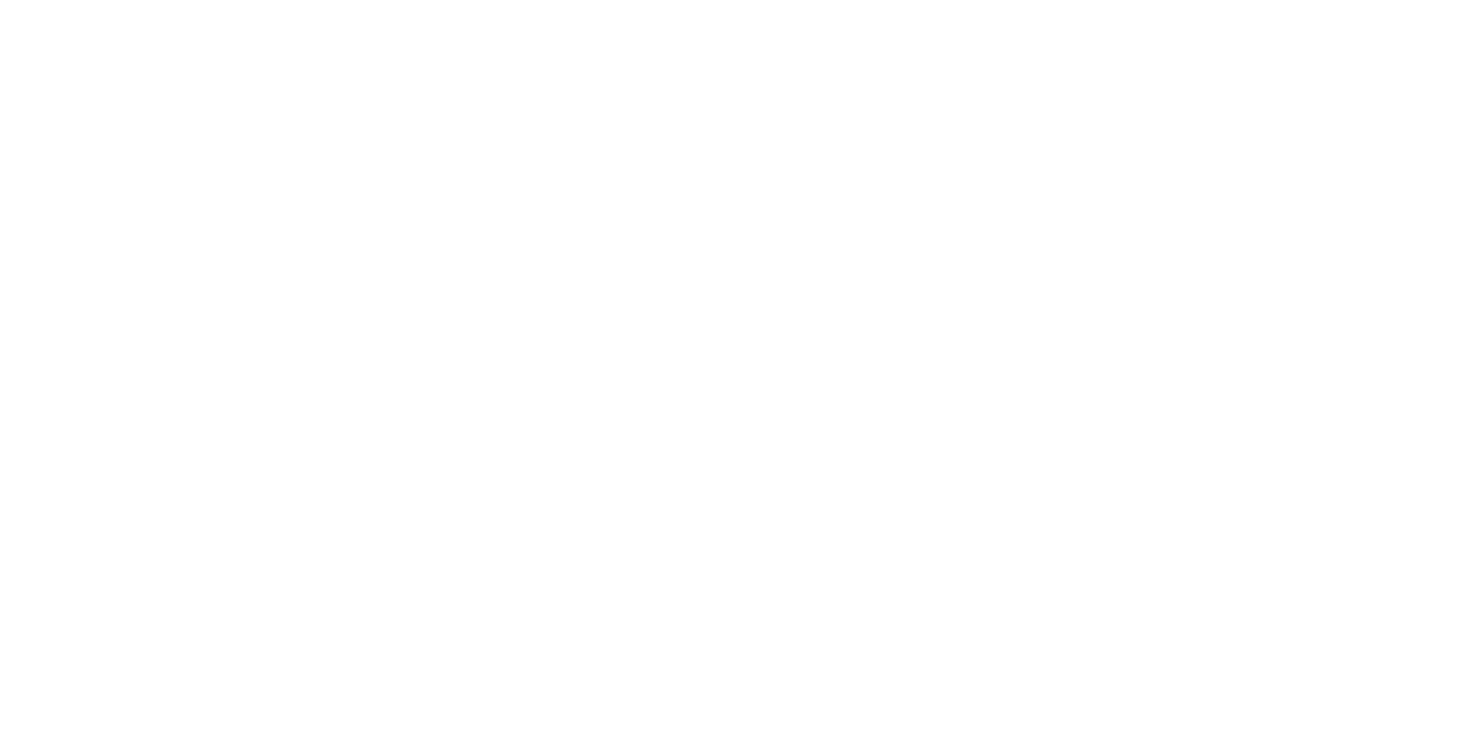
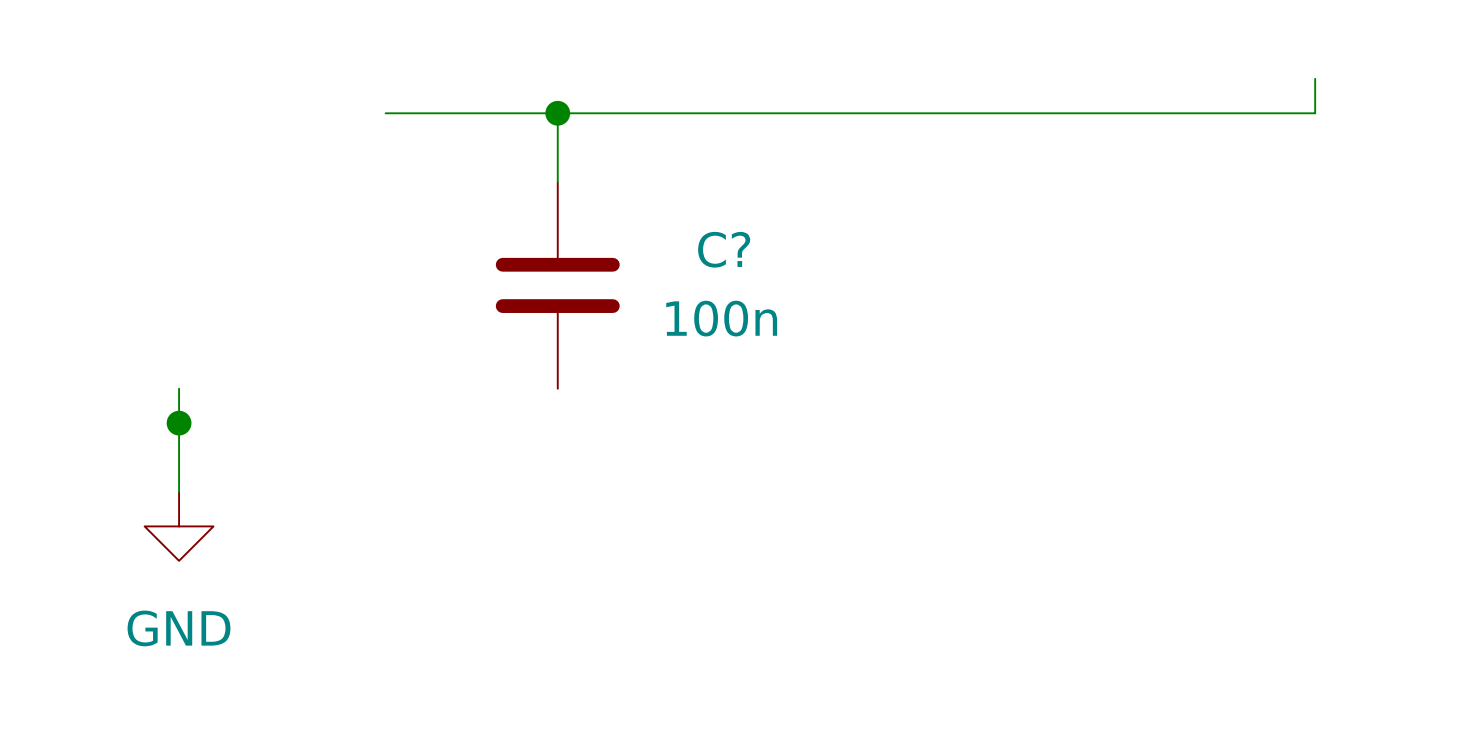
wire: none -> (1315, 78) (1315, 113) (385, 113)
wire: none -> (557, 113) (557, 182)
junction: none -> (557, 113)
C?: none -> 100n (557, 285)
wire: none -> (179, 388) (179, 491)
junction: none -> (179, 423)
power symbol: none -> GND (179, 526)

